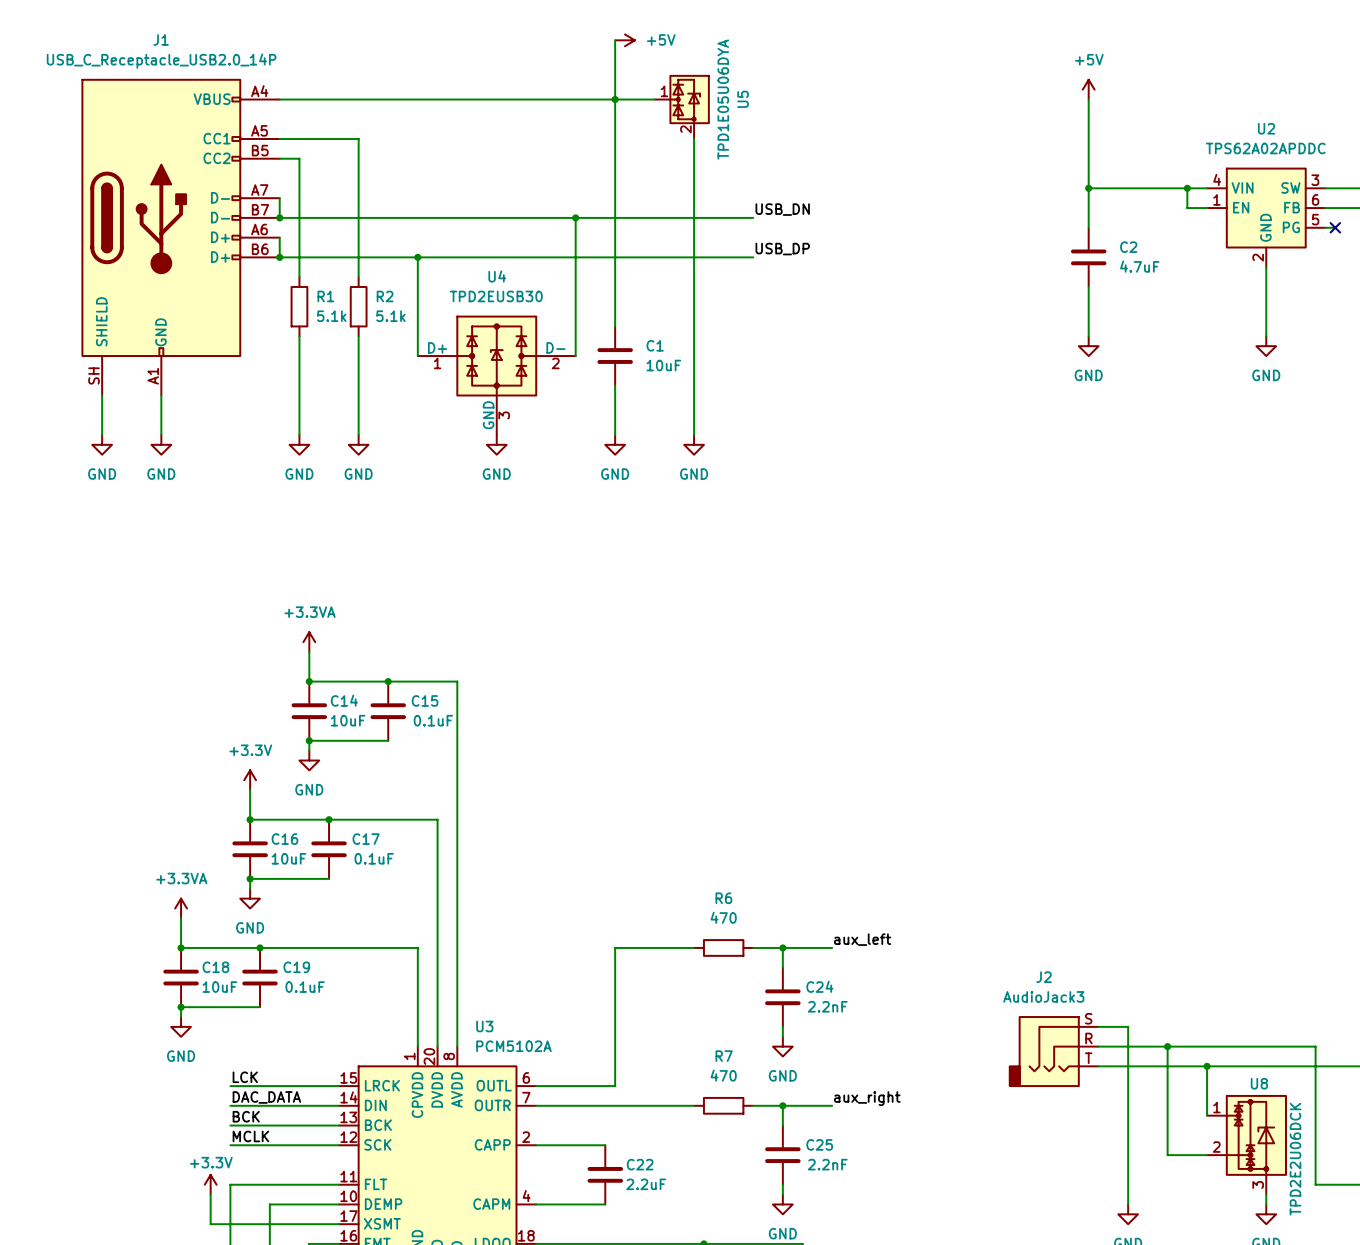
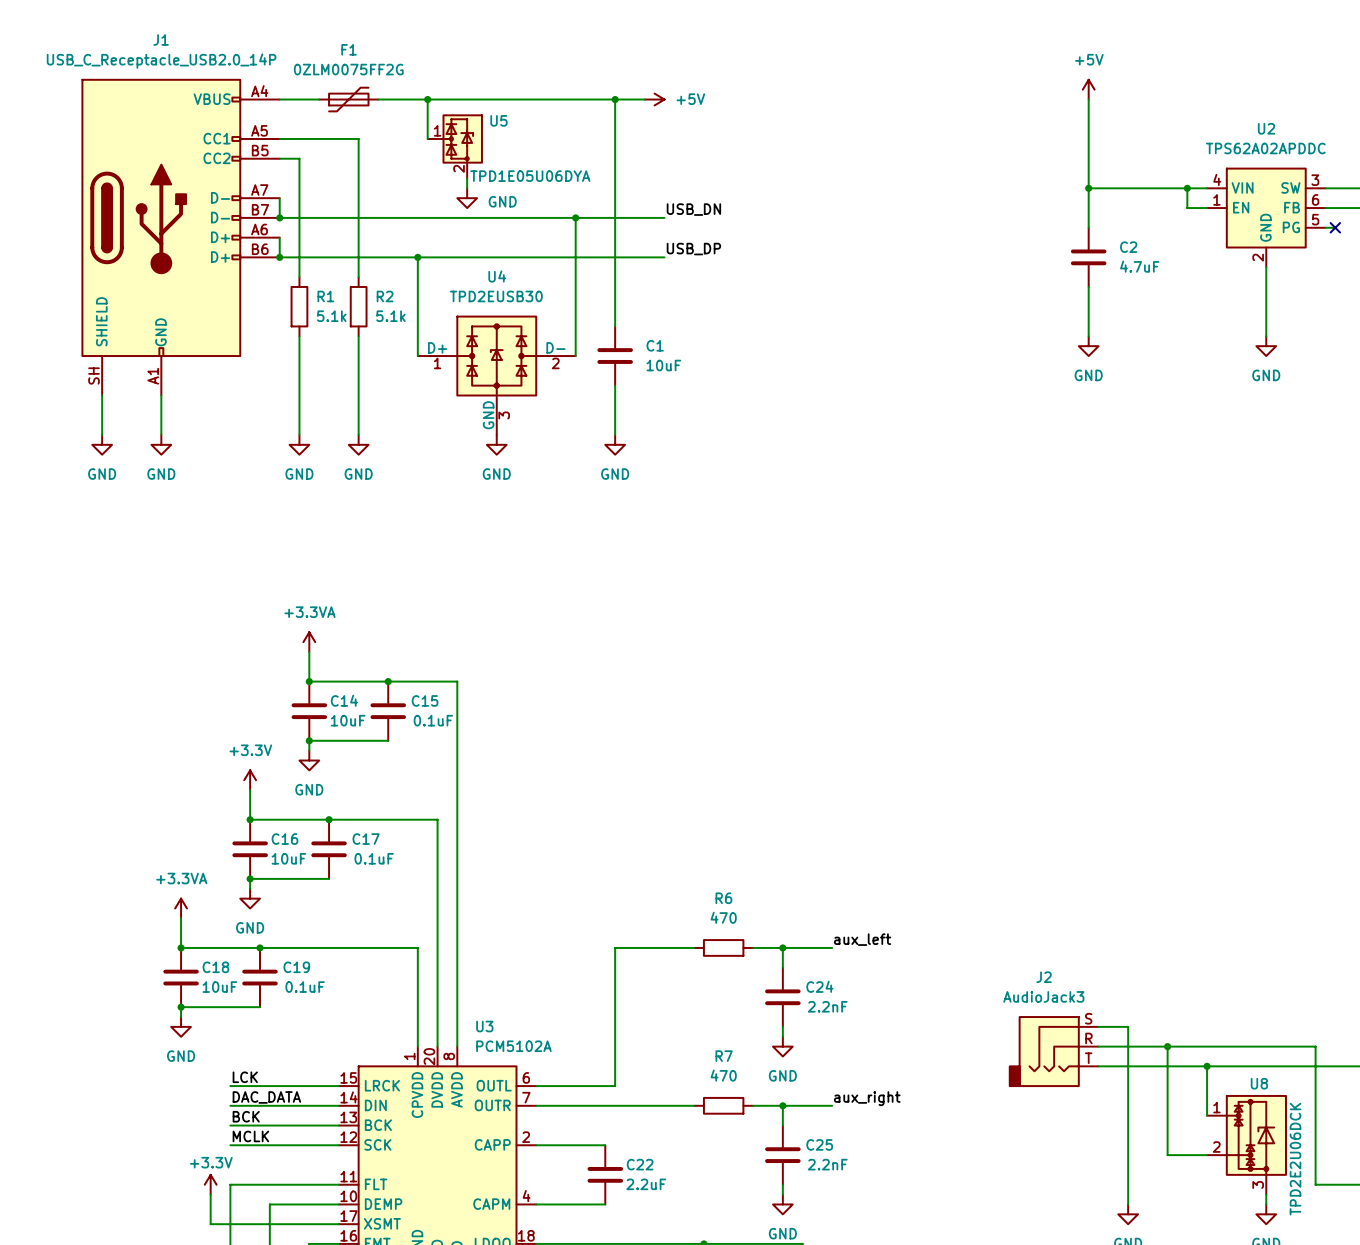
wire: (615, 40) (615, 99) -> none
power symbol position: +5V (625, 40) -> +5V (654, 99)
F1: none -> 0ZLM0075FF2G (348, 99)
wire: none -> (427, 99) (427, 138)
junction: none -> (427, 99)
U5 value rotation: 0° (723, 99) -> 90° clockwise (530, 176)
U5 name rotation: 0° (743, 99) -> 90° clockwise (498, 120)
U5 name position: U5 (743, 99) -> U5 (498, 120)
U5 position: (682, 106) -> (455, 146)
wire: (694, 138) (694, 434) -> none
wire: none -> (467, 178) (467, 188)
power symbol: none -> GND (467, 198)
label position: USB_DN (782, 209) -> USB_DN (693, 209)
wire: (664, 217) (753, 217) -> none
label position: USB_DP (782, 249) -> USB_DP (693, 249)
wire: (664, 257) (753, 257) -> none
power symbol: GND (694, 444) -> none

